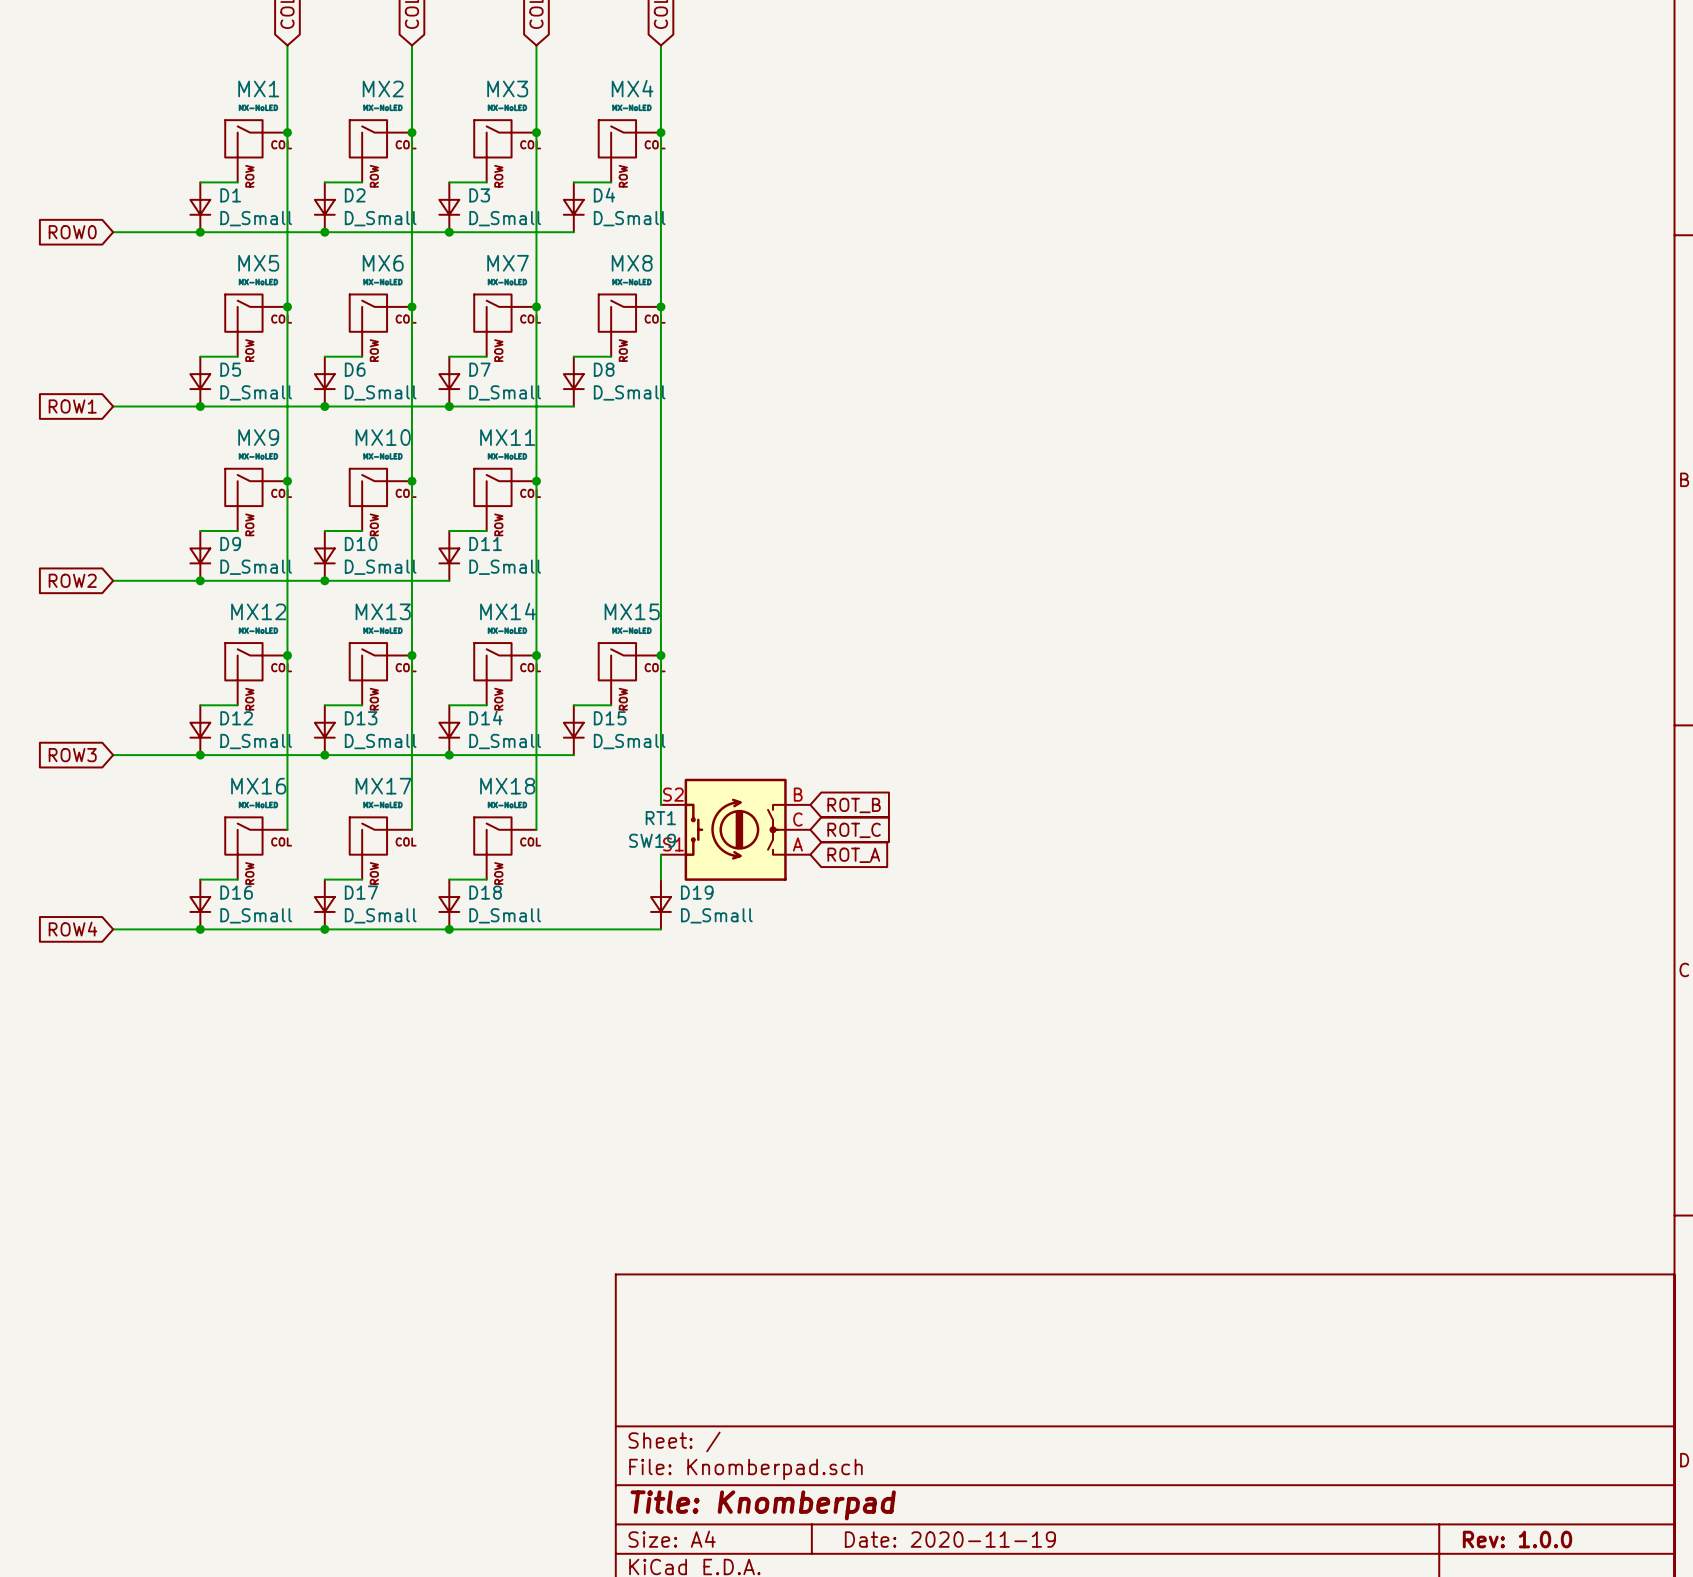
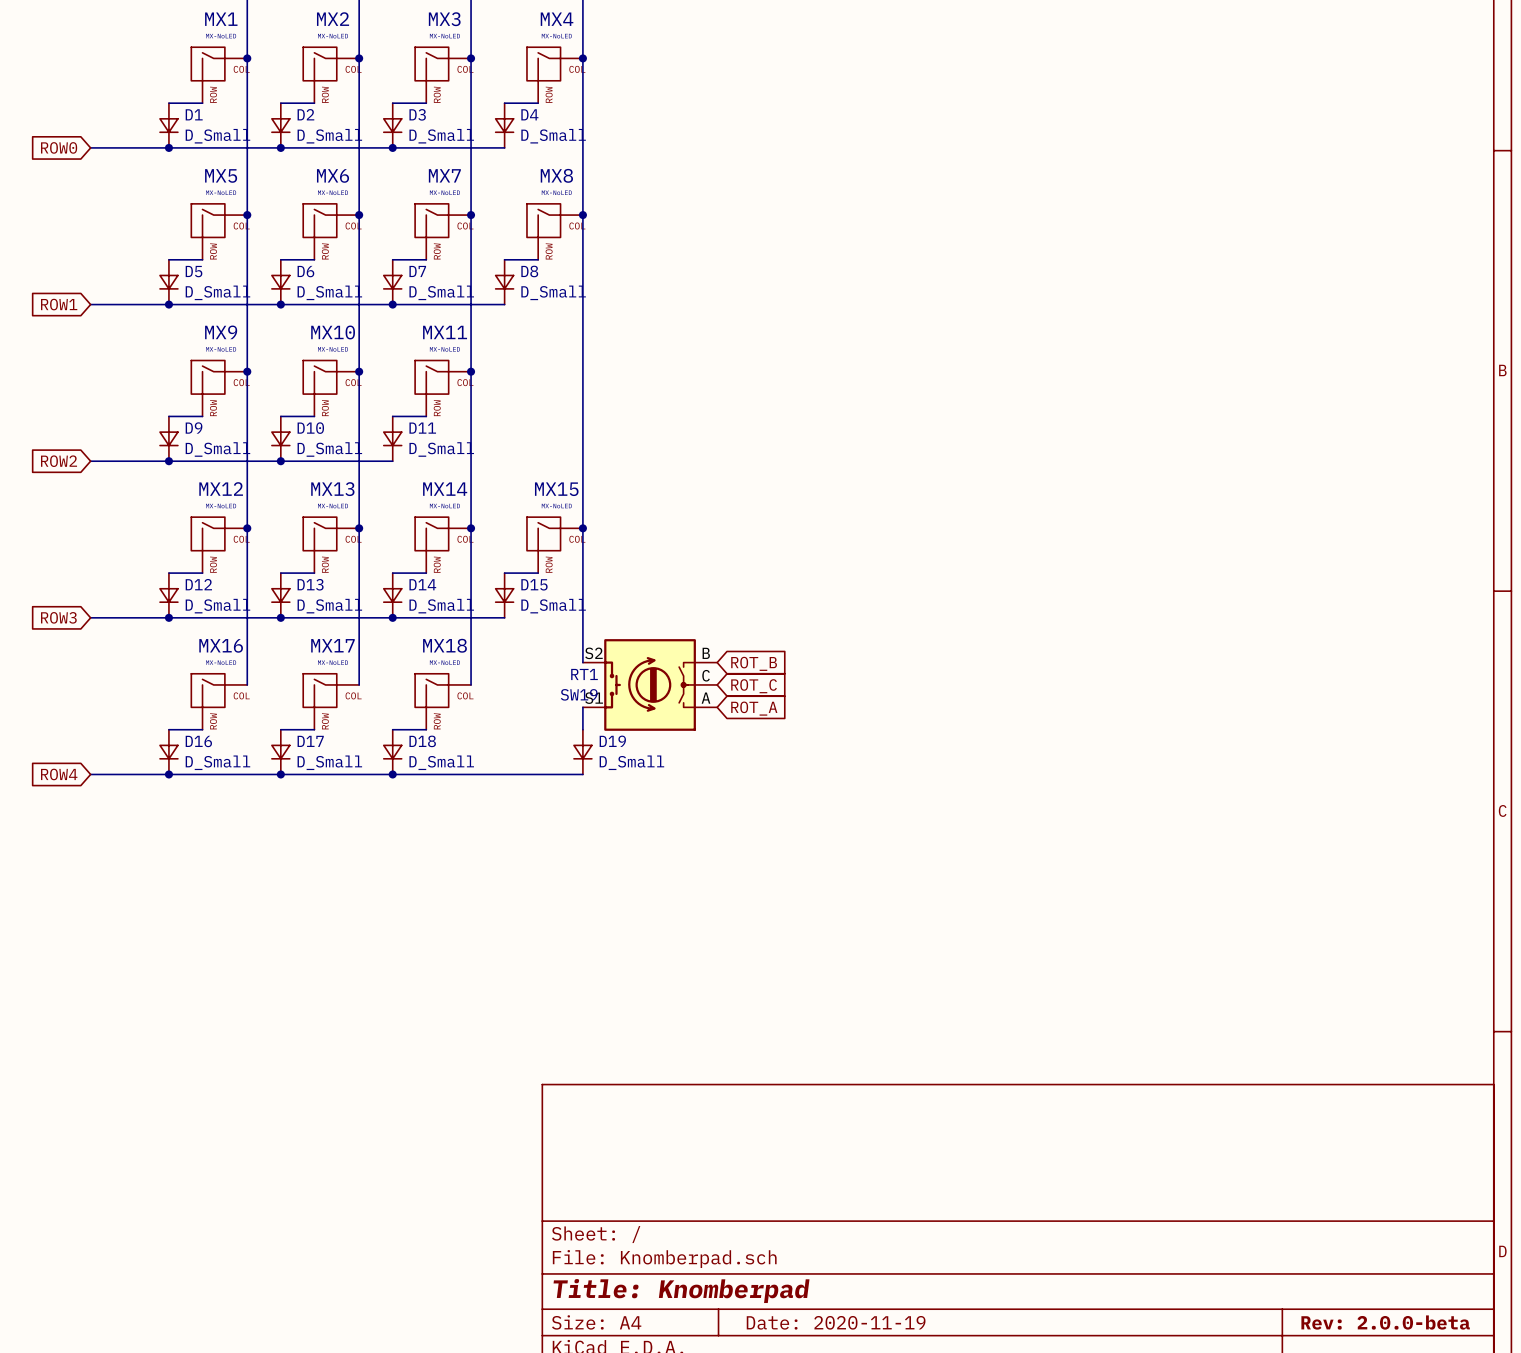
title block: Rev: 1.0.0 (1517, 1539) -> Rev: 2.0.0-beta (1385, 1322)

